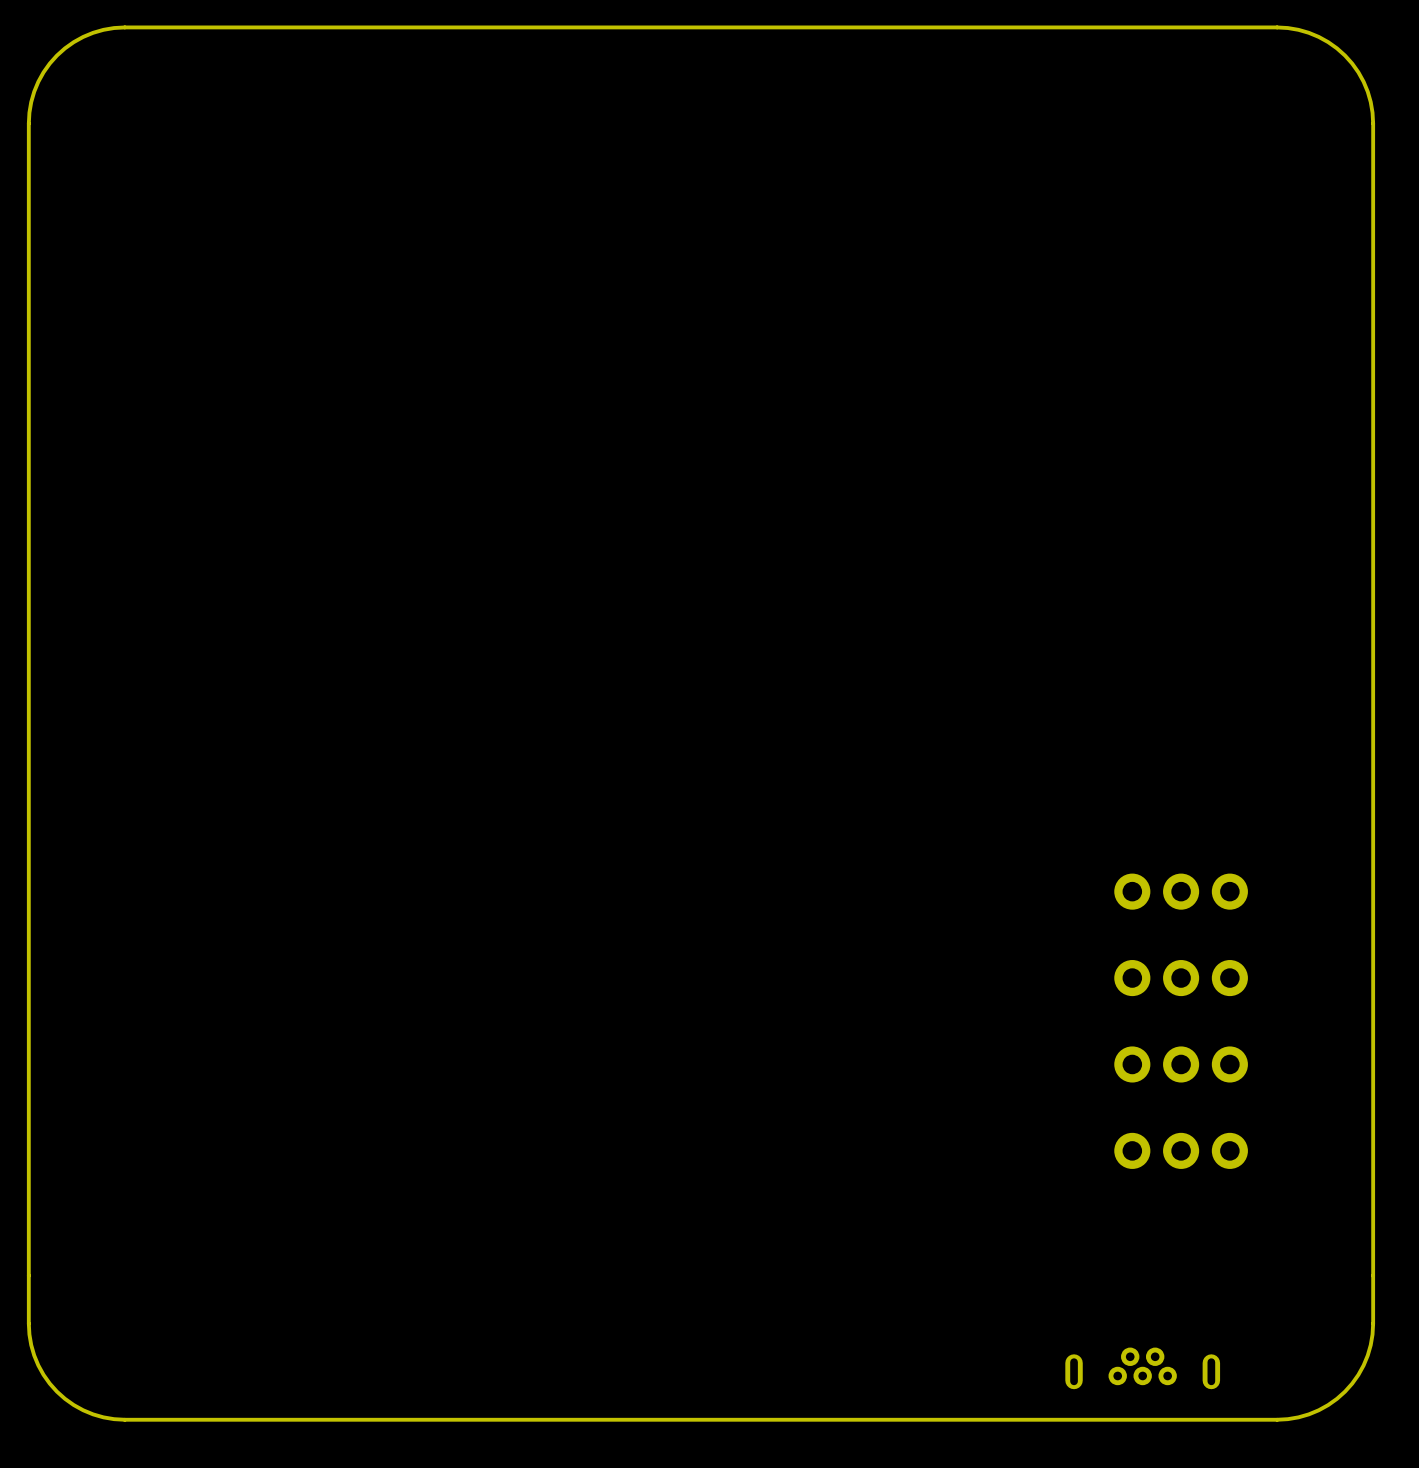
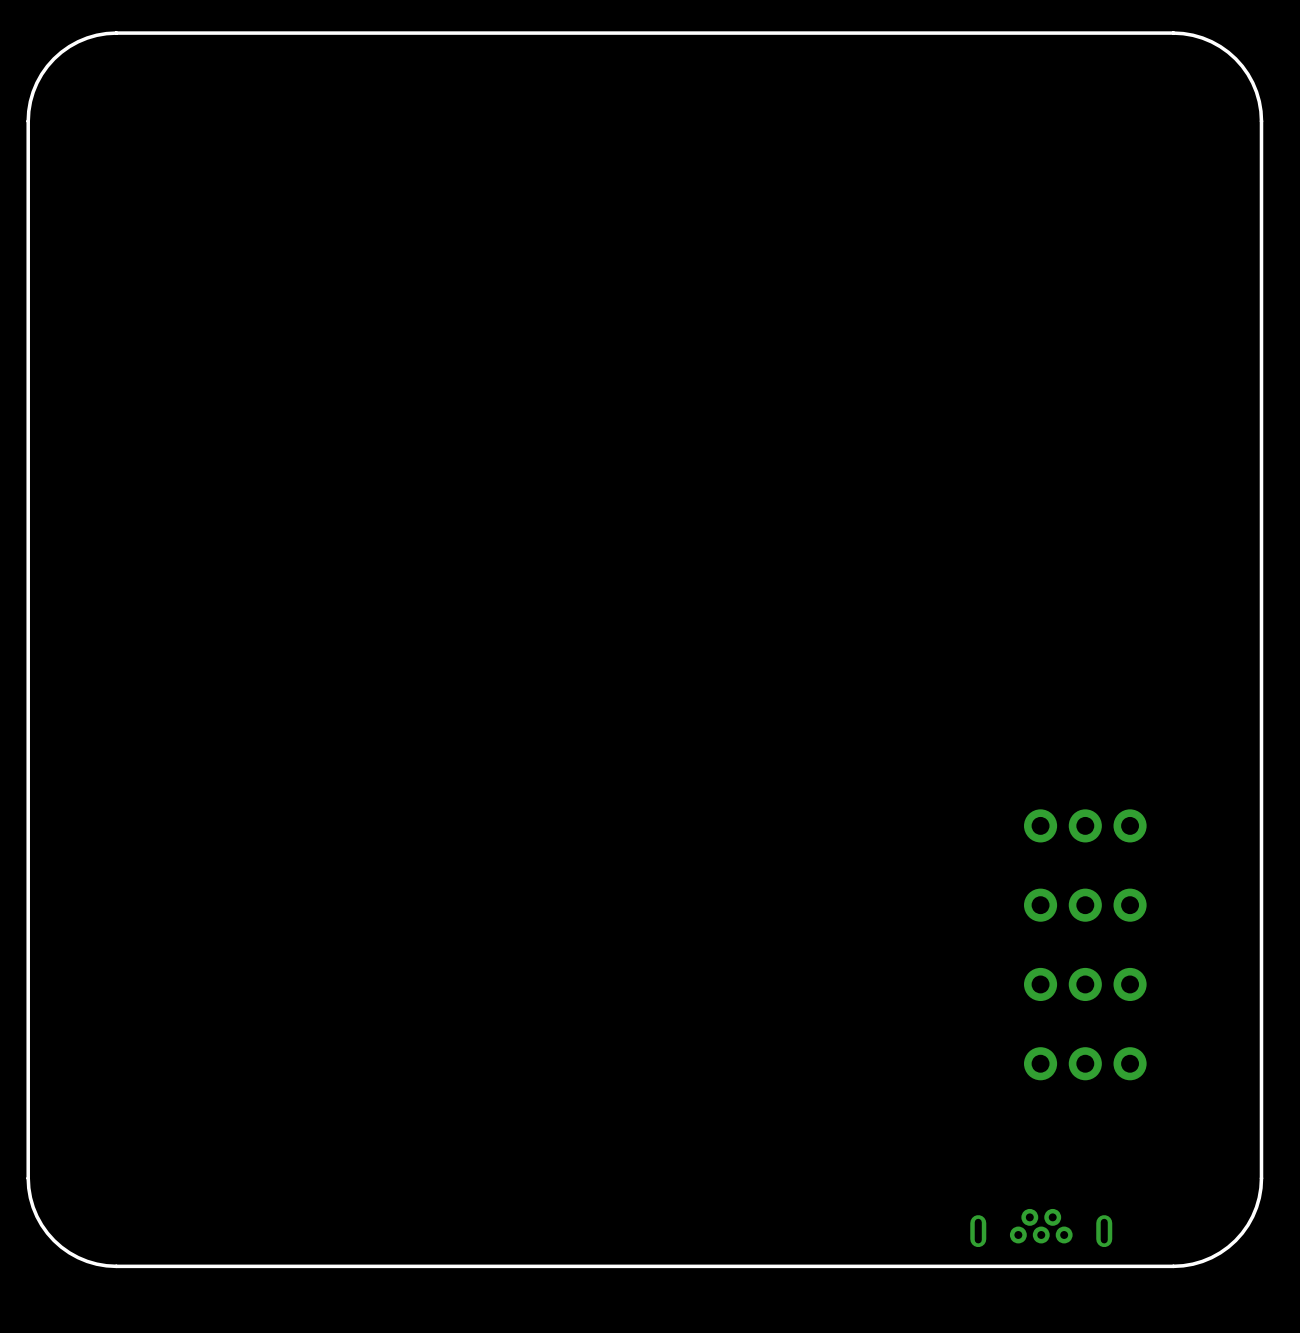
board edge: (1373, 1275) (1372, 1334) (1367, 1355) (1358, 1374) (1345, 1391) (1328, 1405) (1308, 1414) (1277, 1419) (114, 1419) (93, 1414) (73, 1405) (56, 1391) (43, 1374) (34, 1355) (29, 1334) (28, 1275) -> (1261, 1178) (1256, 1207) (1247, 1225) (1235, 1240) (1220, 1252) (1202, 1261) (1173, 1266) (106, 1265) (78, 1257) (54, 1240) (36, 1216) (30, 1197) (28, 1178)
part position: (1142, 1368) -> (1041, 1228)

